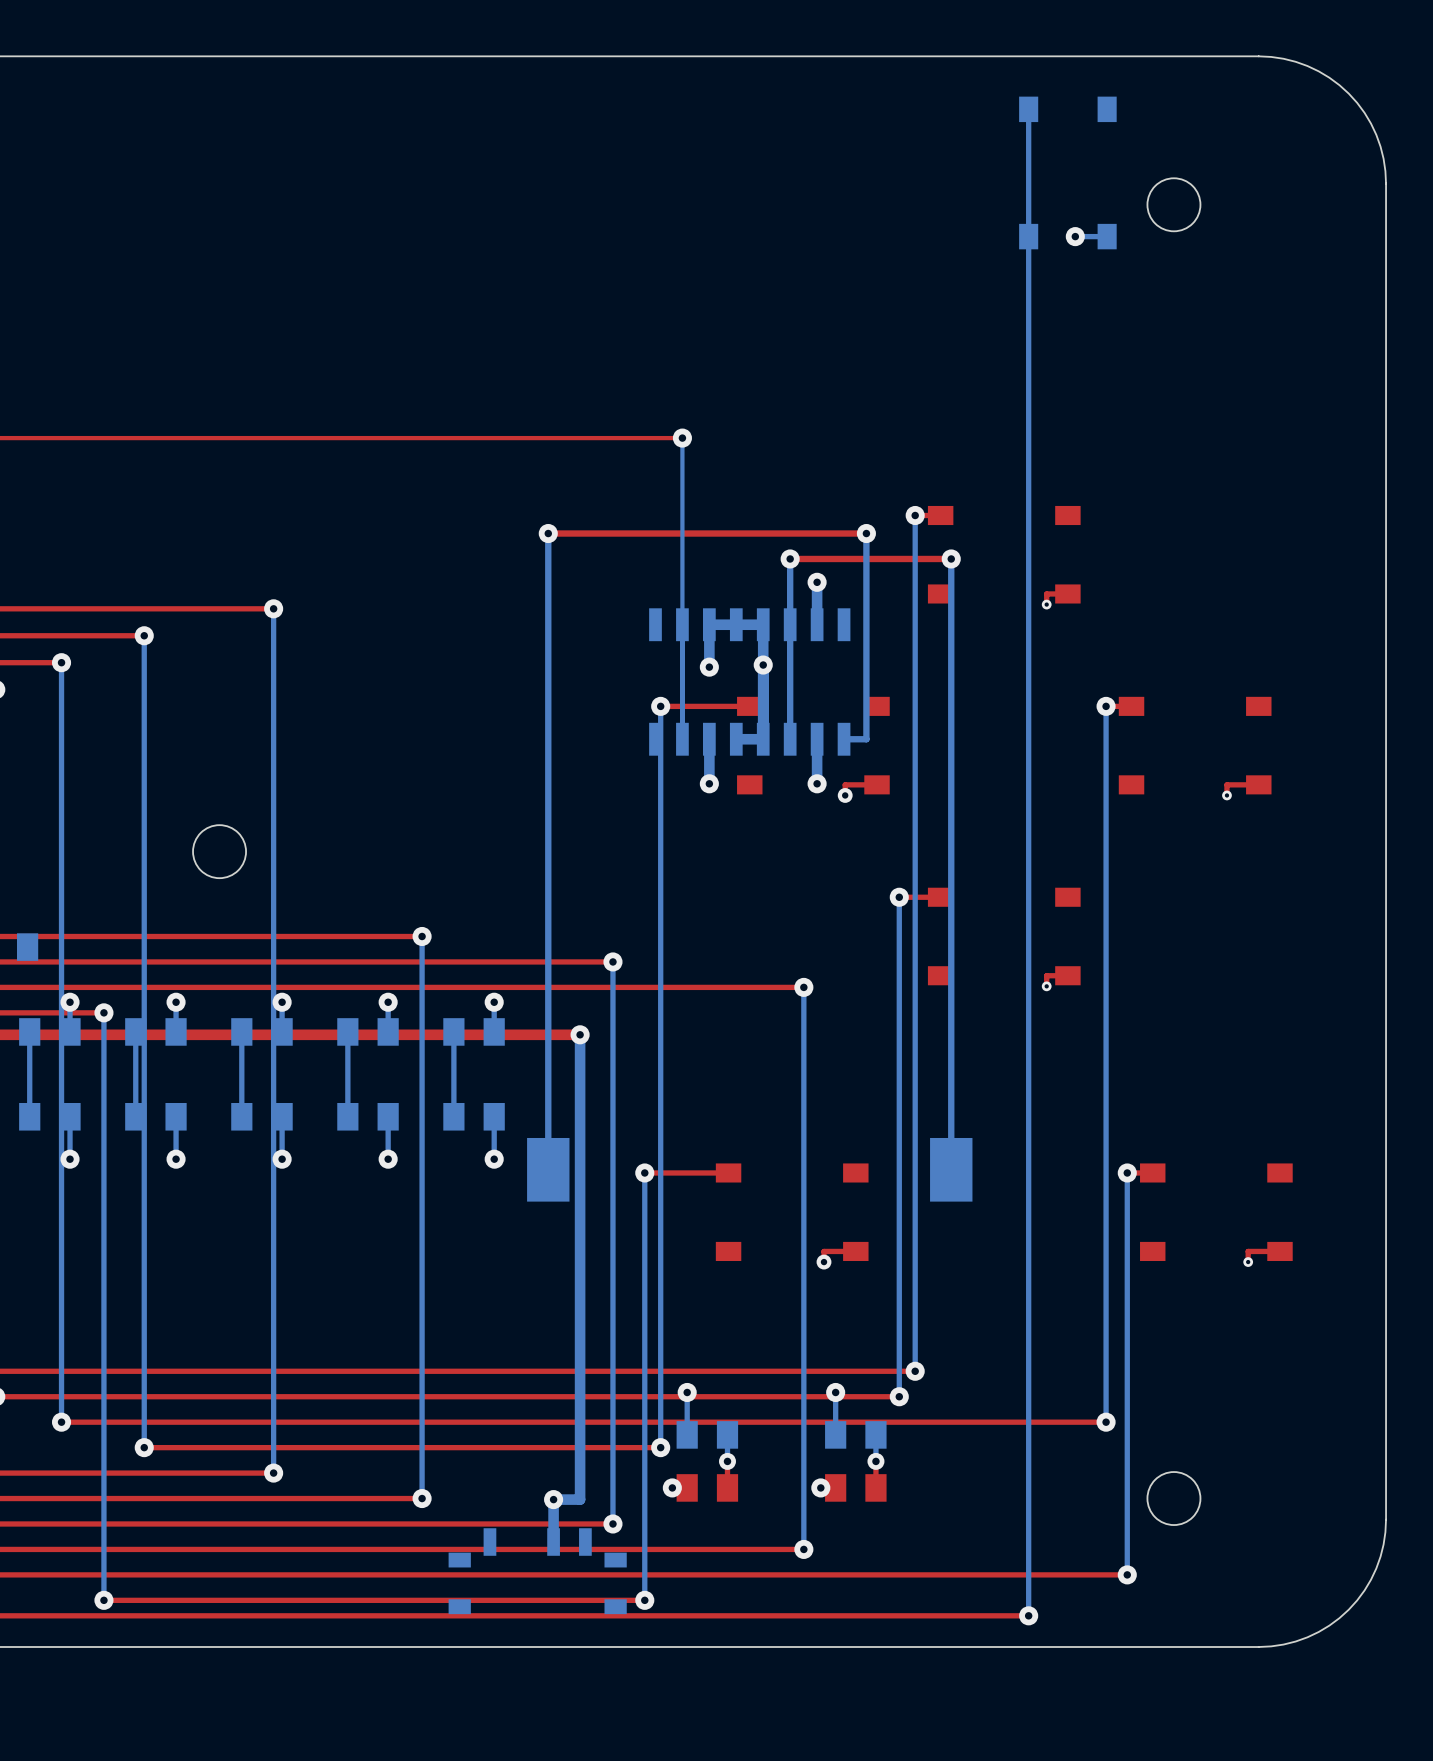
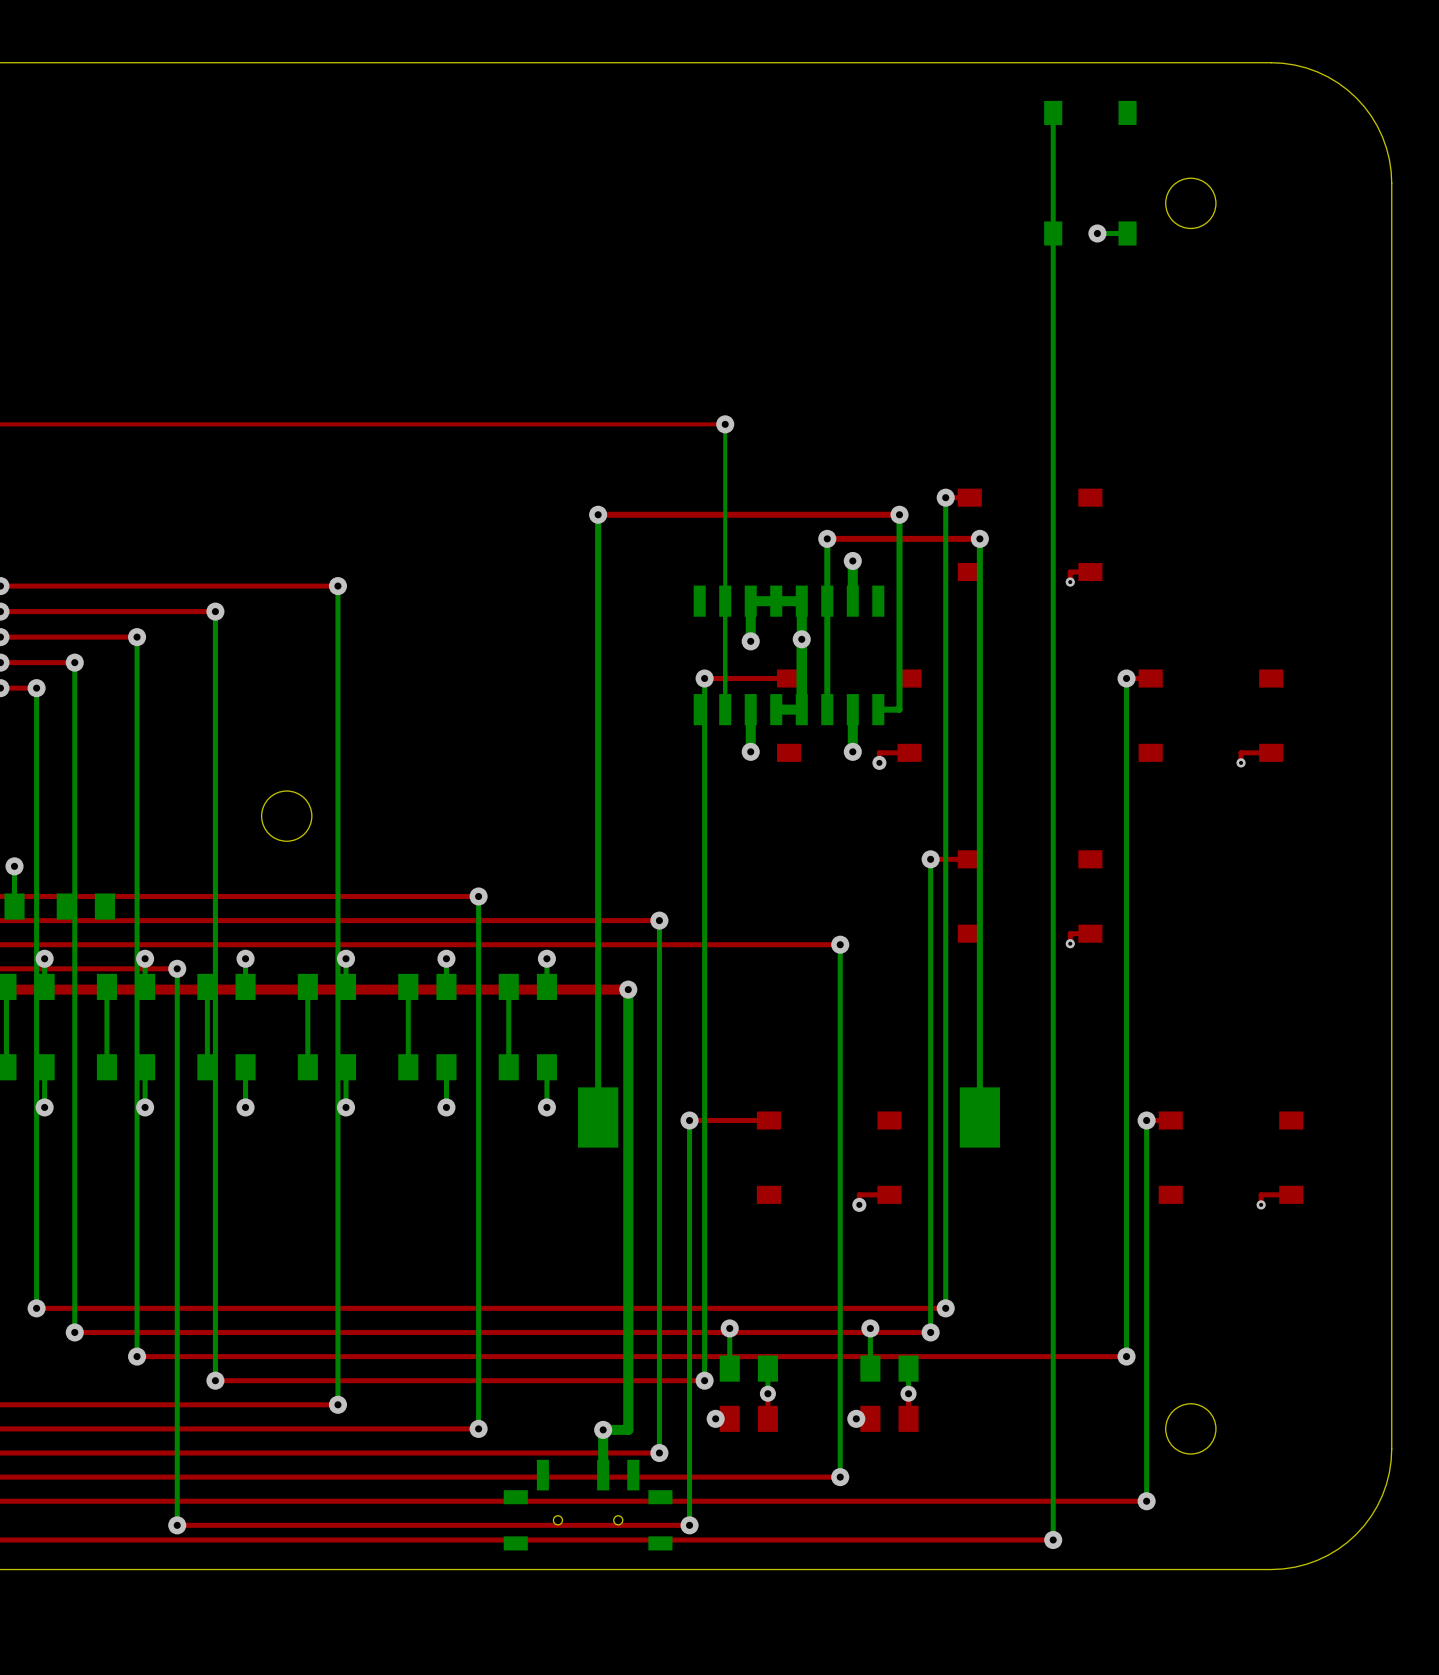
part footprint: [448, 1528, 627, 1615] -> [503, 1459, 673, 1551]

